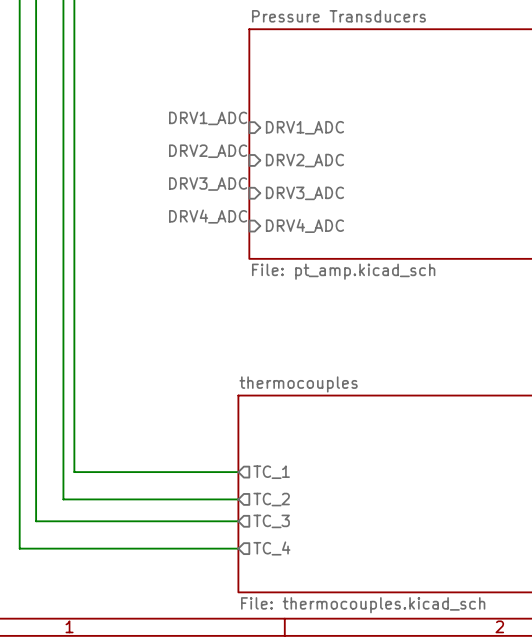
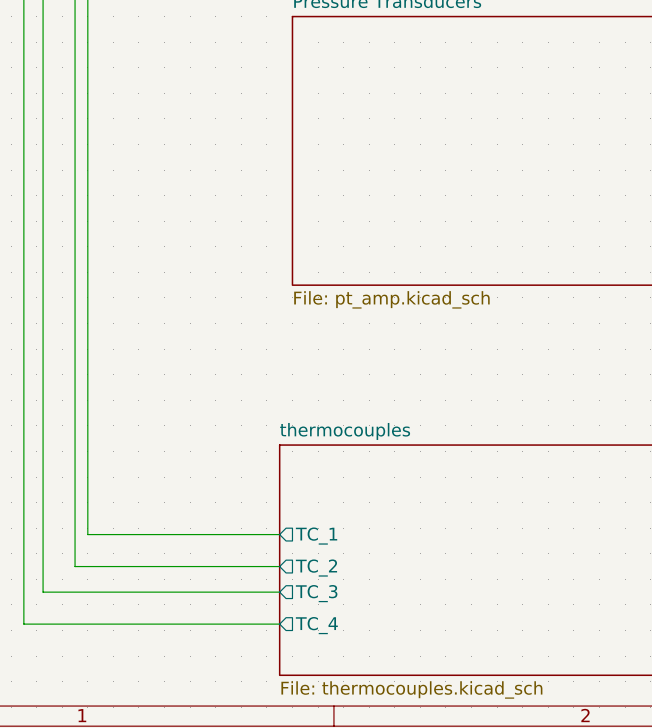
label: DRV1_ADC (208, 118) -> none
sheet pin: DRV1_ADC (304, 127) -> none
label: DRV2_ADC (208, 151) -> none
sheet pin: DRV2_ADC (304, 160) -> none
label: DRV3_ADC (208, 184) -> none
sheet pin: DRV3_ADC (304, 193) -> none
label: DRV4_ADC (208, 216) -> none
sheet pin: DRV4_ADC (304, 225) -> none

